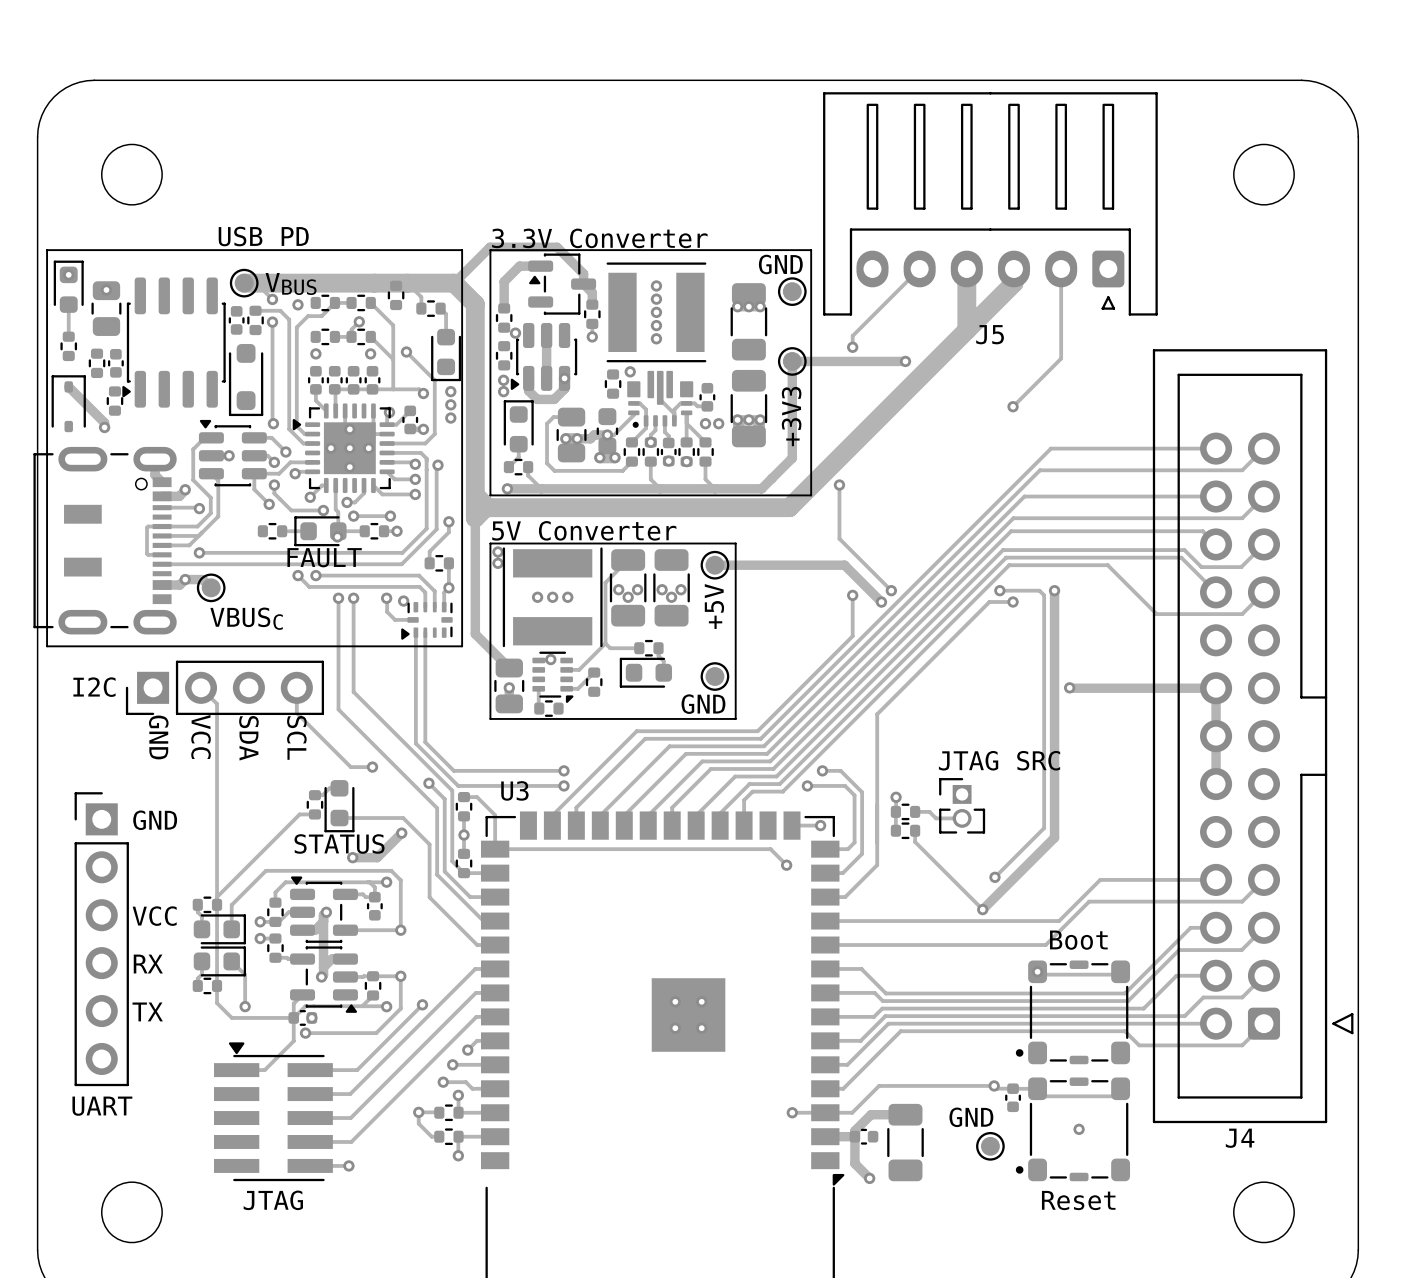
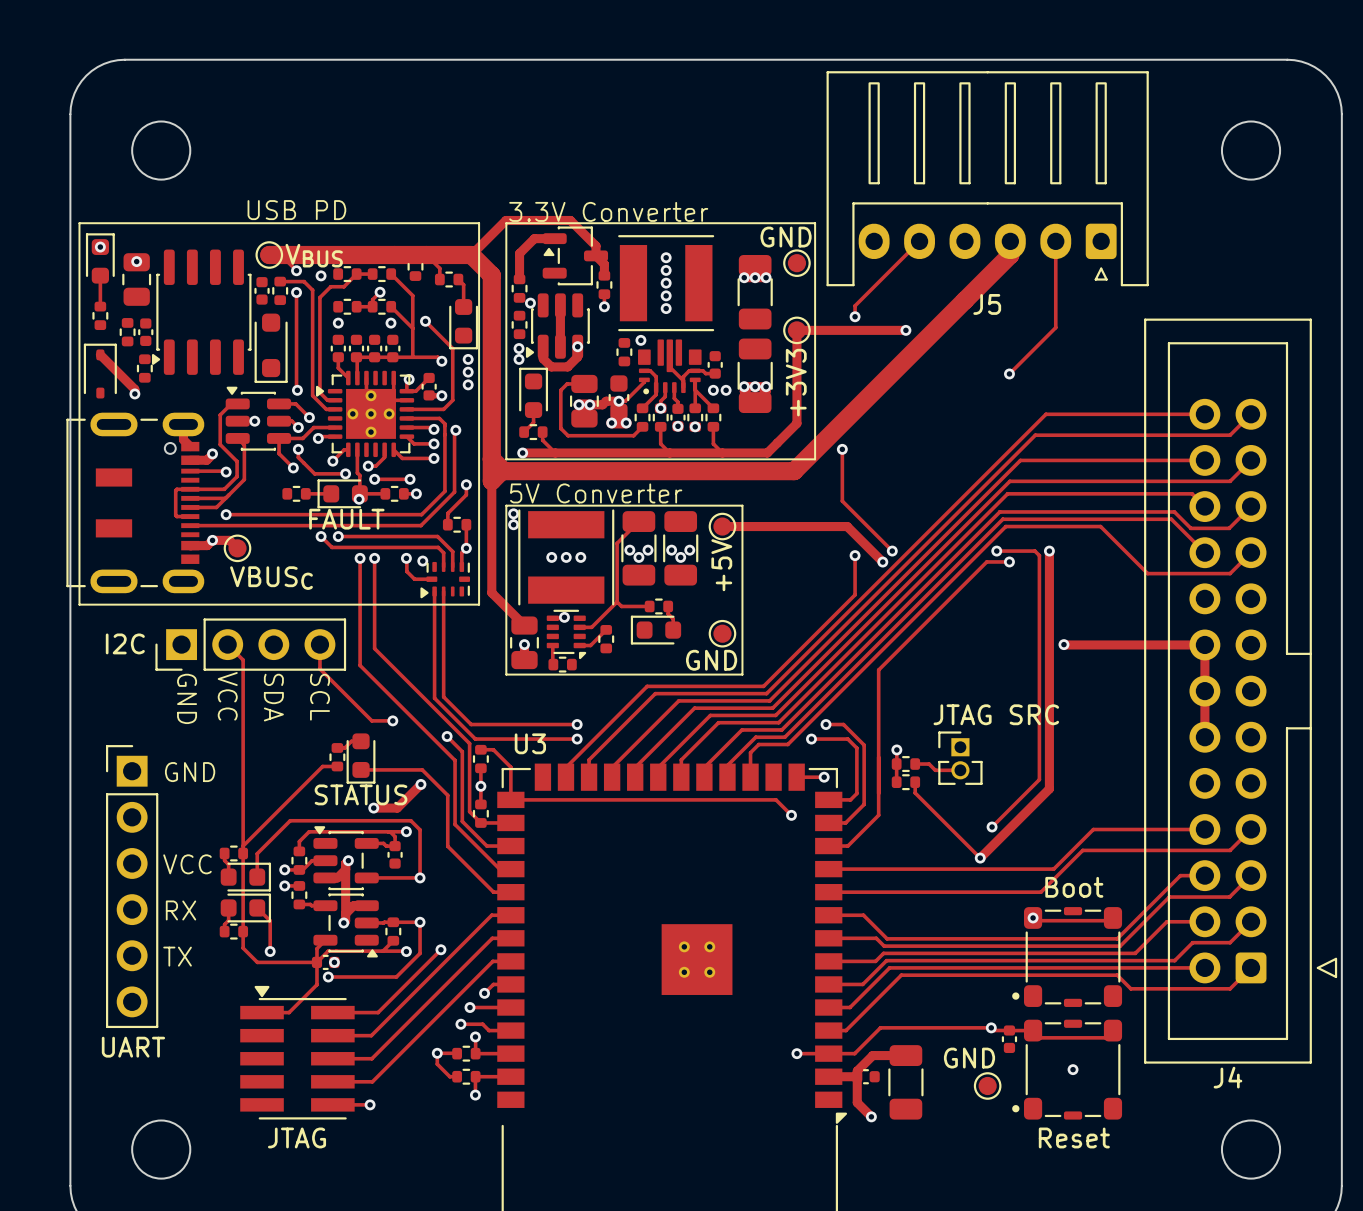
track: (966, 268) (966, 330) -> none

